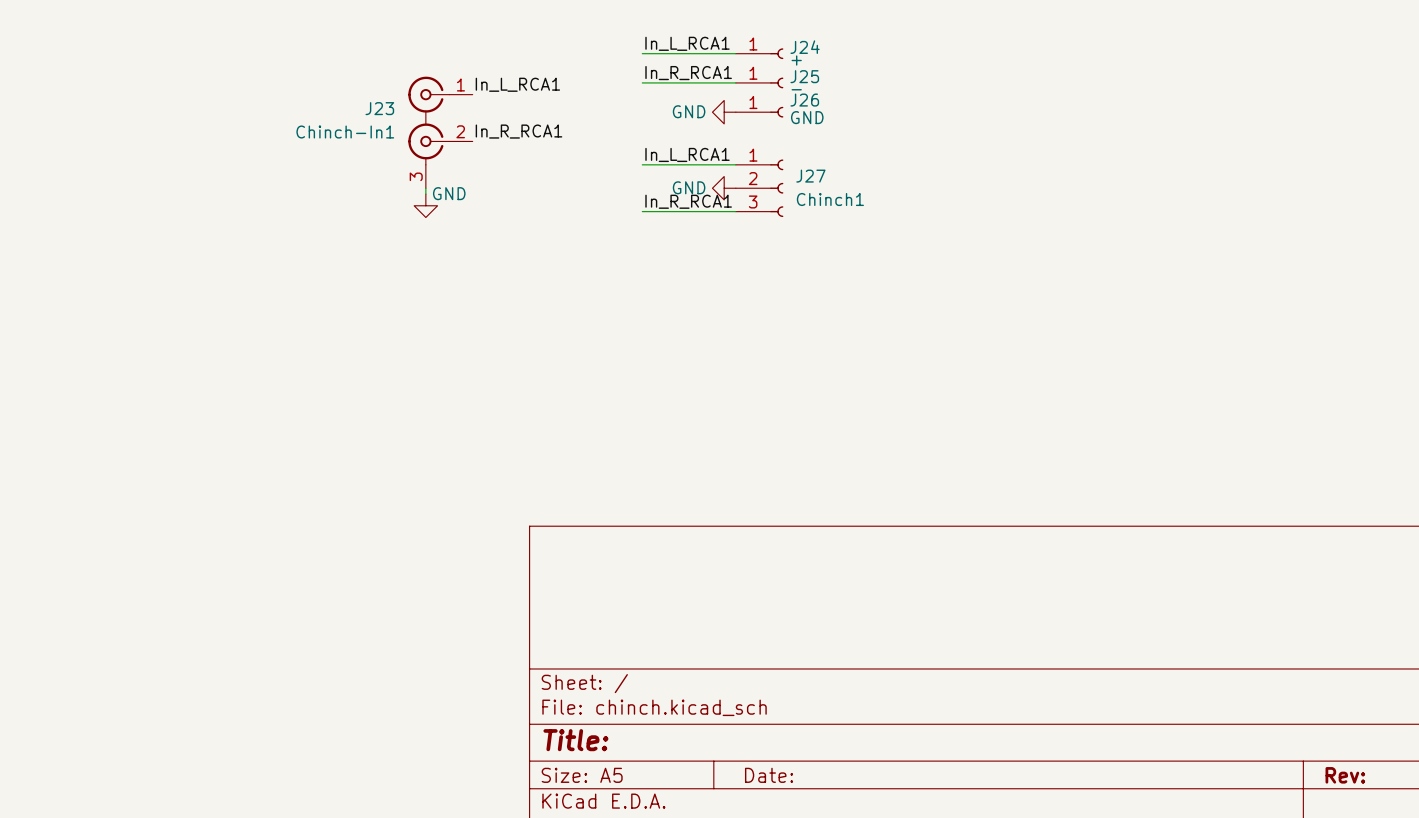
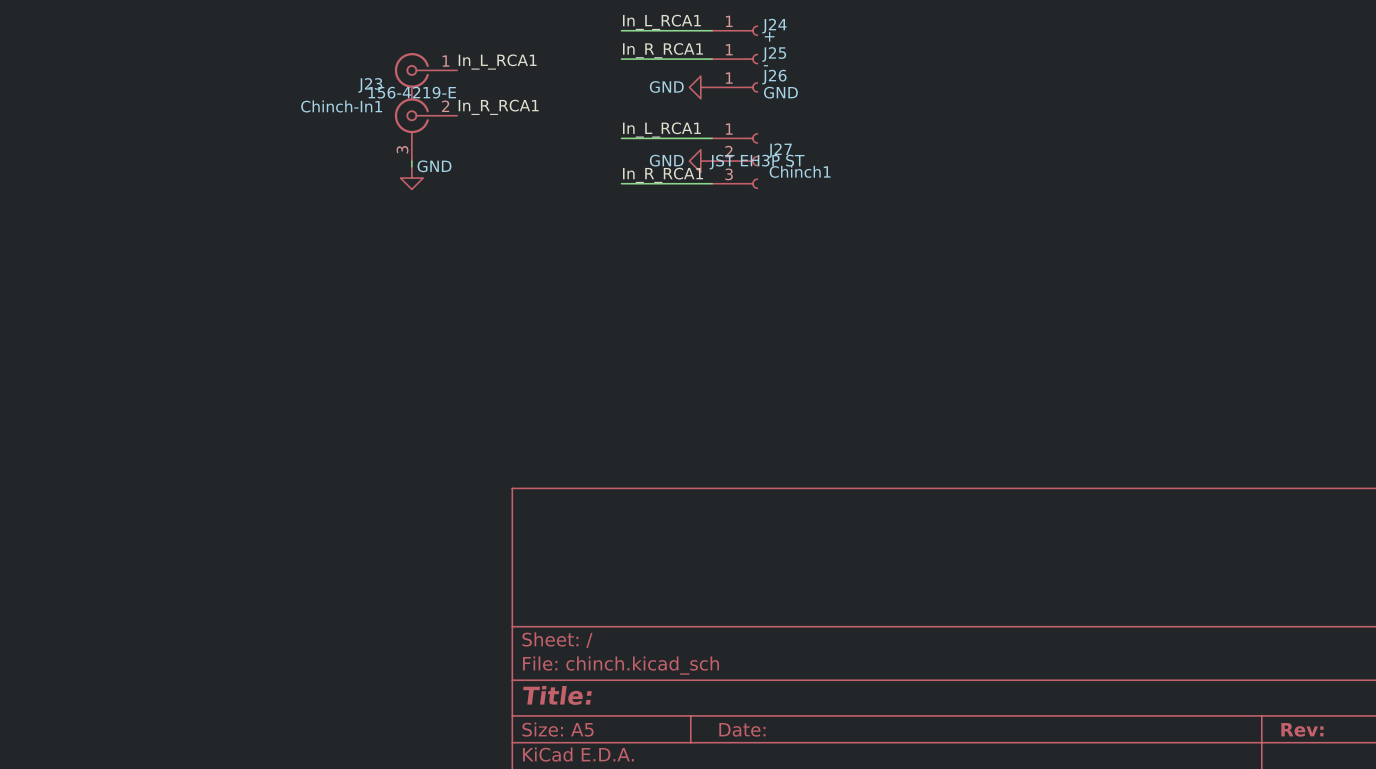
J23 text: none -> 156-4219-E (412, 92)
J27 text: none -> JST EH3P ST (757, 162)

